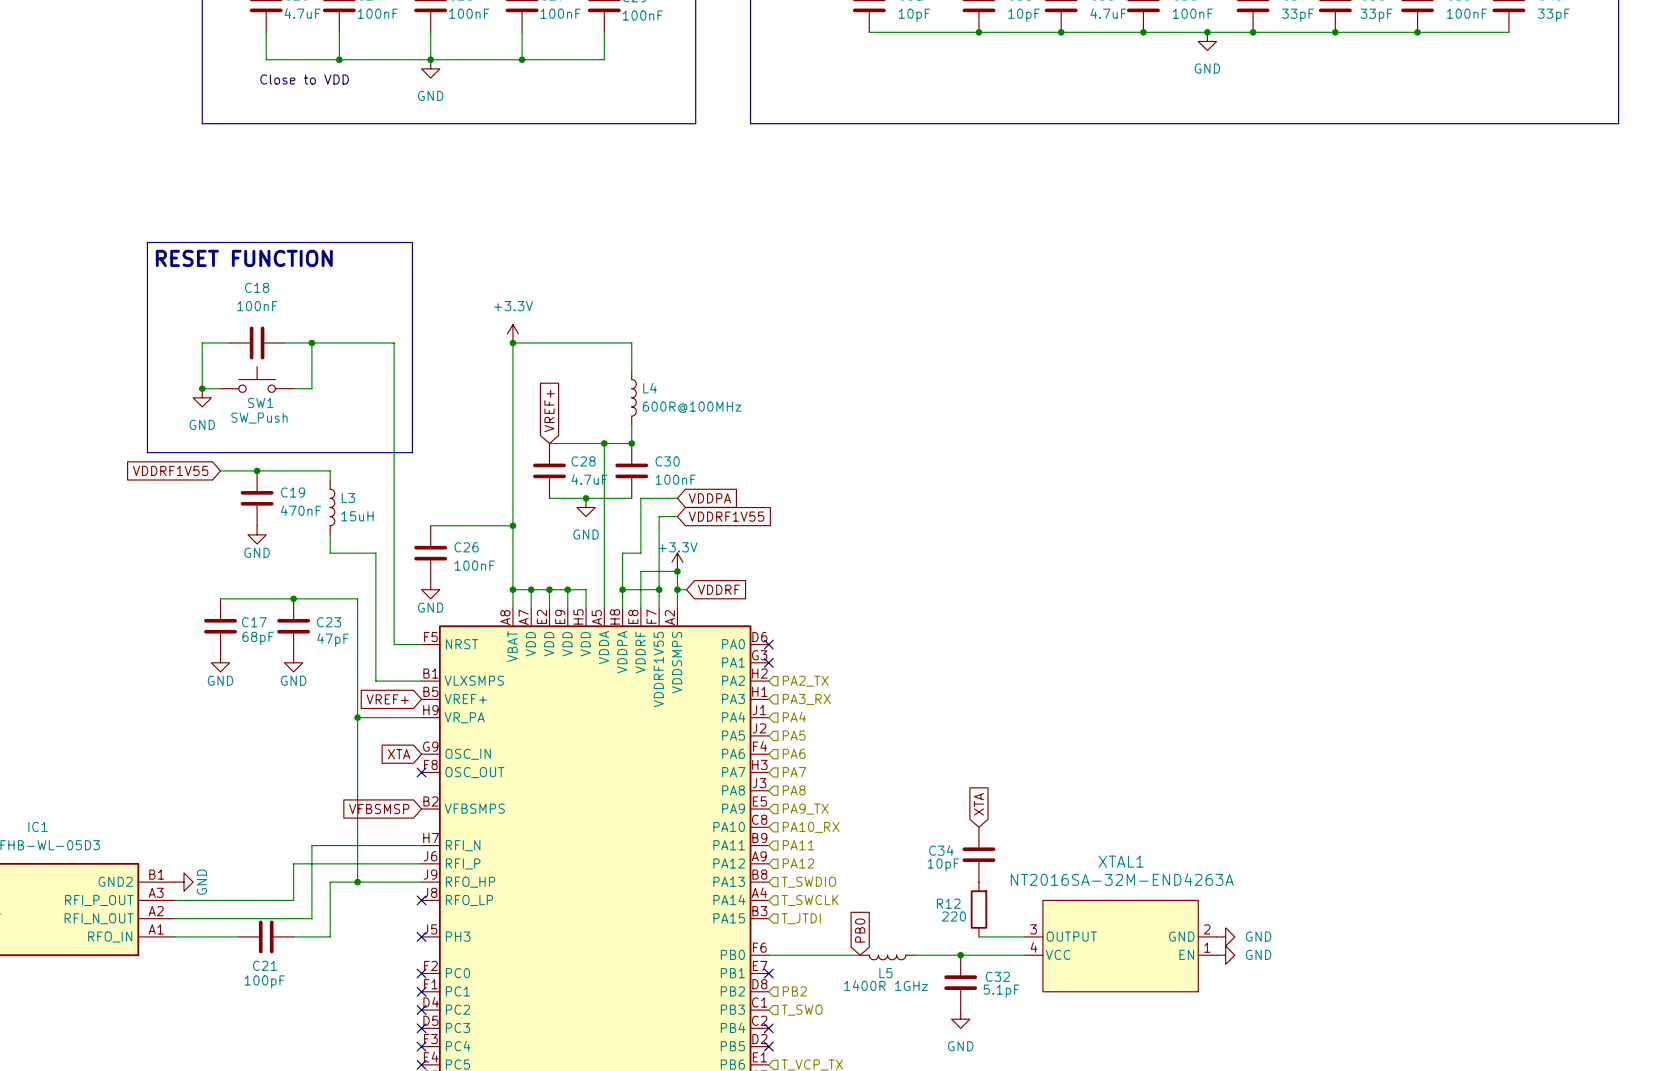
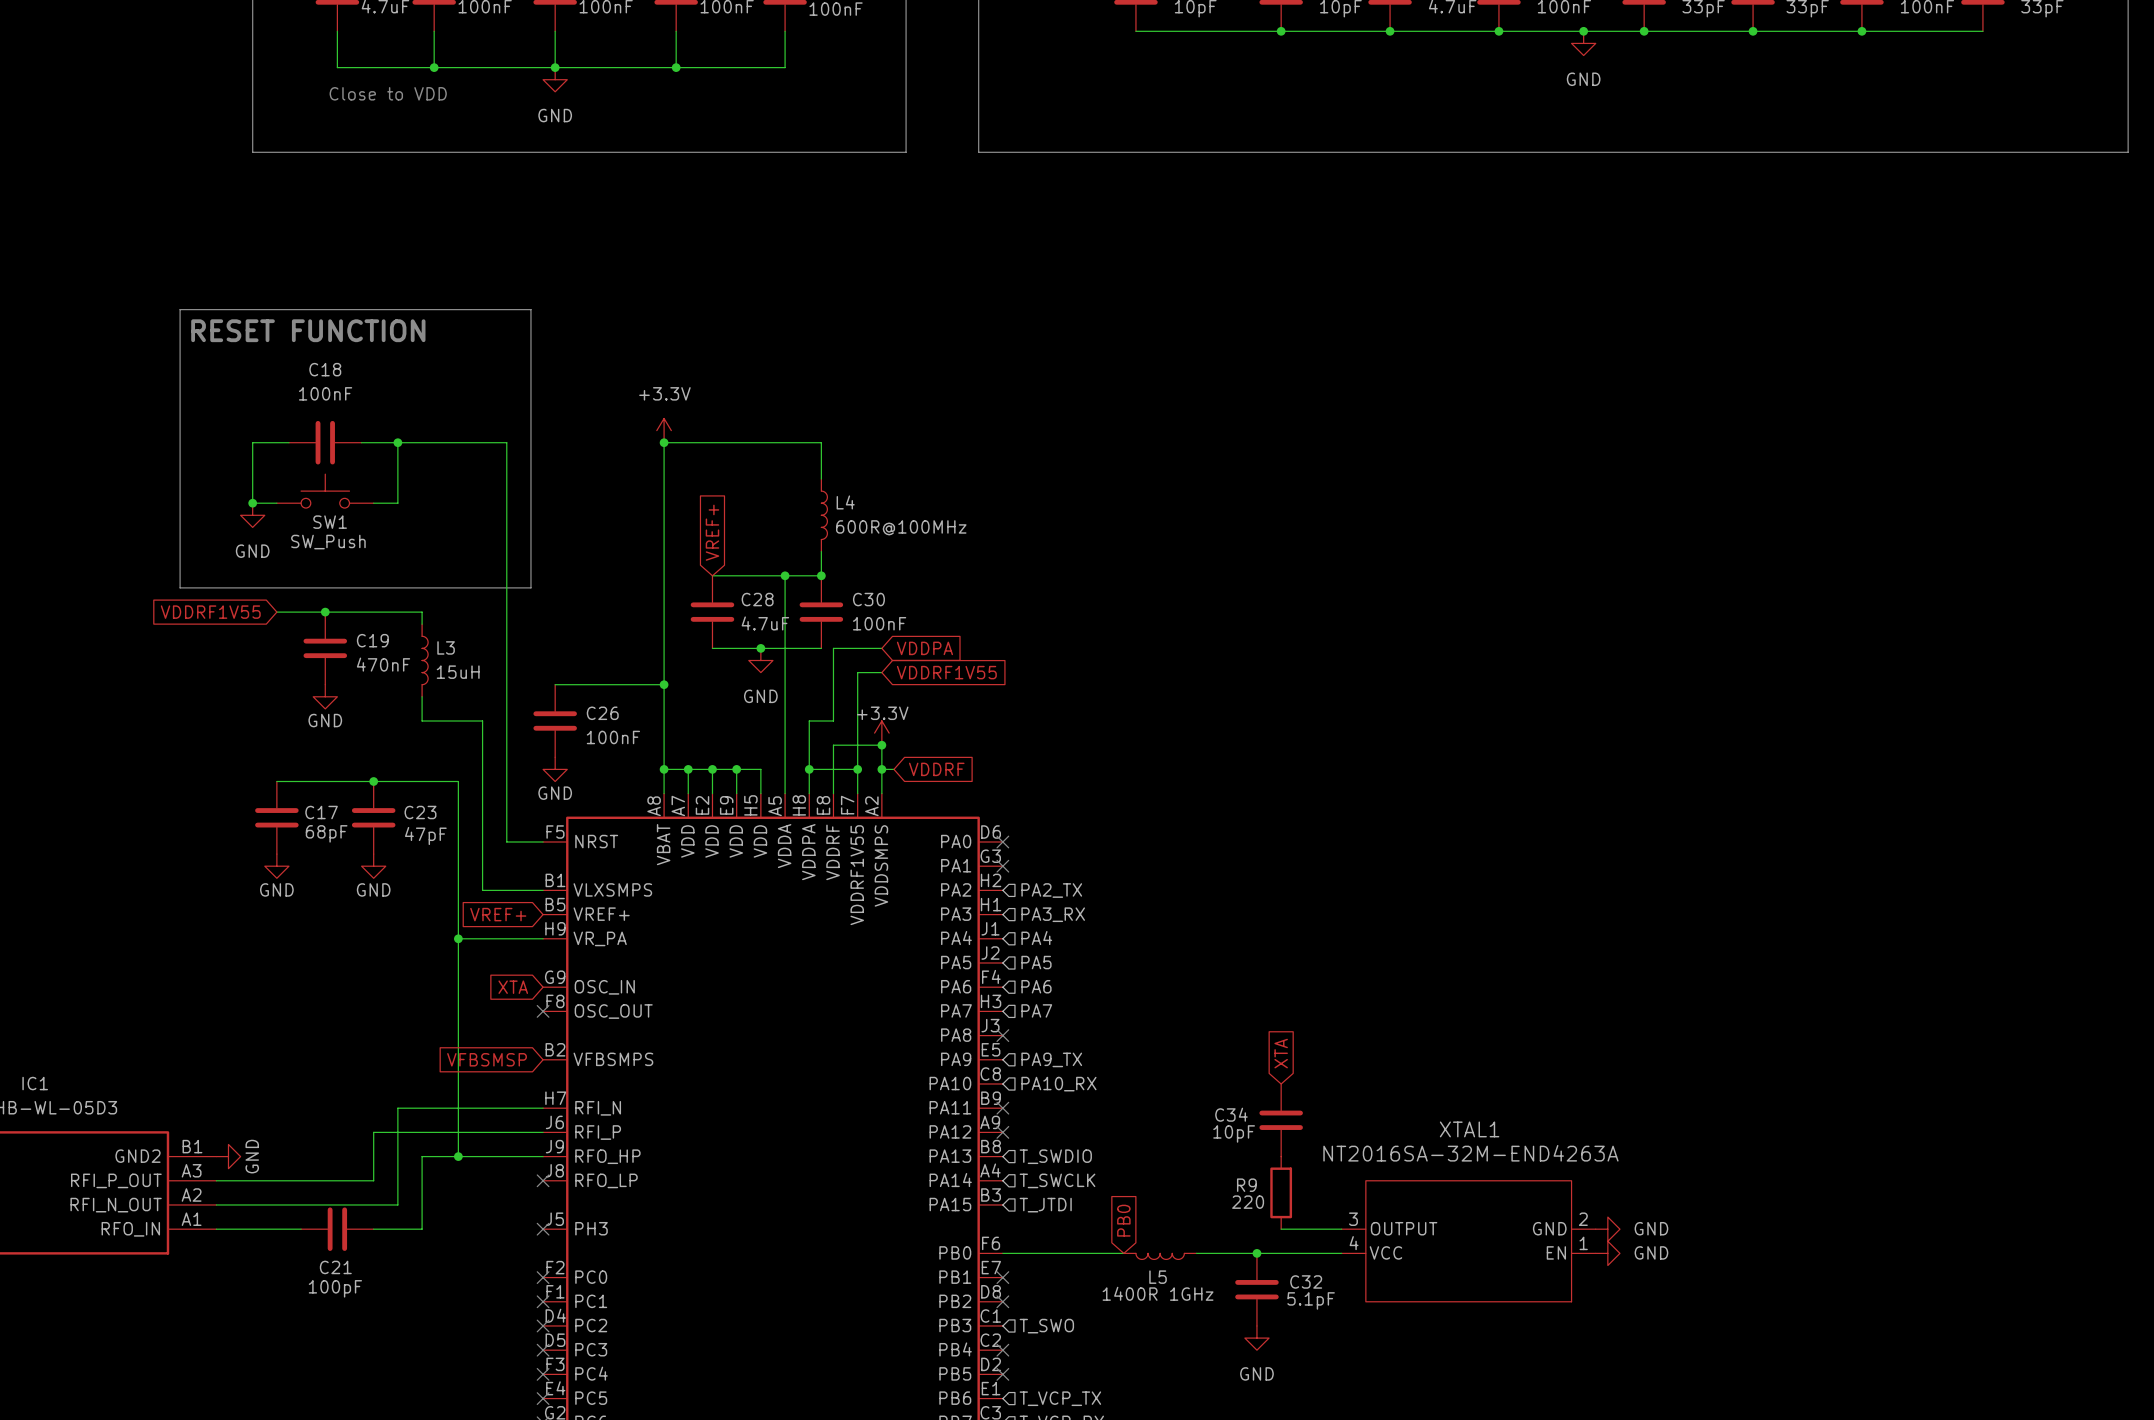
no-connect mark: none -> (1002, 1035)
hierarchical label: PA8 (794, 790) -> none
no-connect mark: none -> (1002, 1108)
hierarchical label: PA11 (798, 845) -> none
no-connect mark: none -> (1002, 1132)
hierarchical label: PA12 (798, 863) -> none
R12 name: R12 (948, 903) -> R9 (1246, 1185)
no-connect mark: none -> (1002, 1301)
hierarchical label: PB2 (794, 991) -> none

